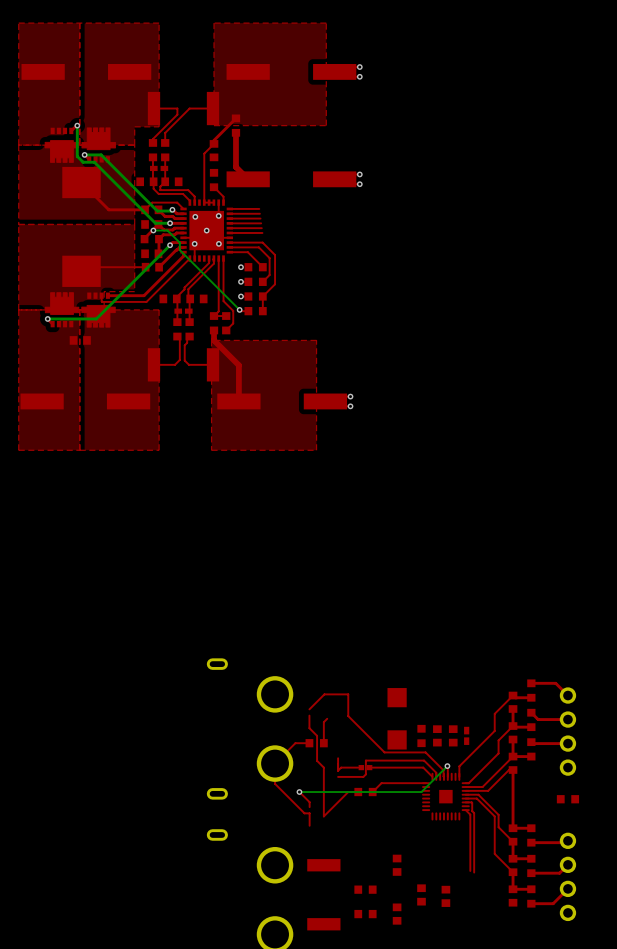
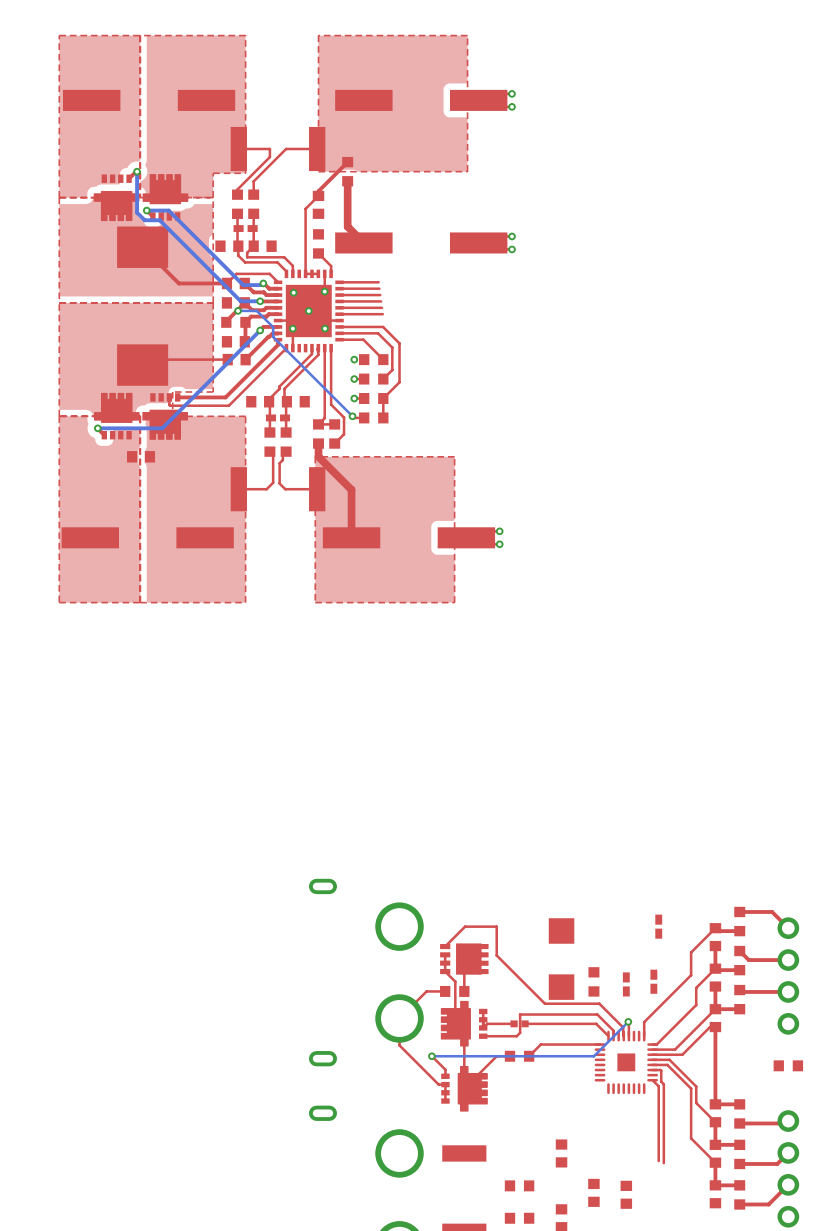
part: none -> (658, 926)
part: none -> (464, 959)
part: (437, 735) -> none
part: (453, 735) -> none
part: none -> (626, 984)
part: none -> (464, 1023)
part: none -> (464, 1088)

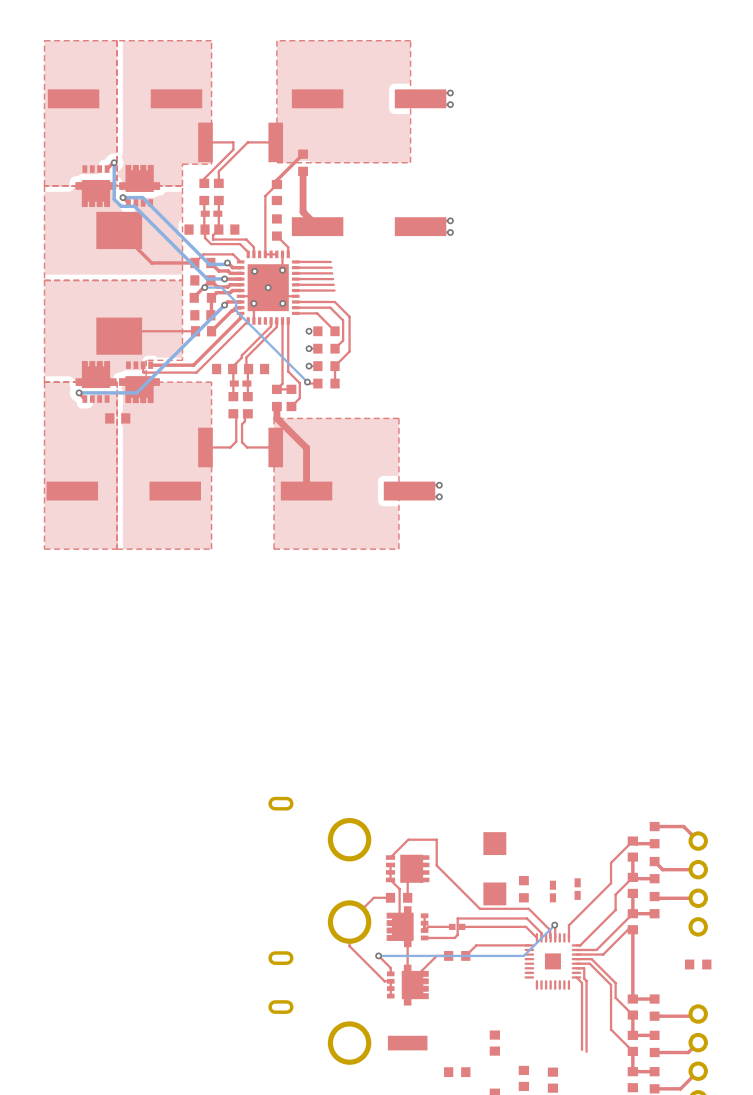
part: (658, 926) -> none

